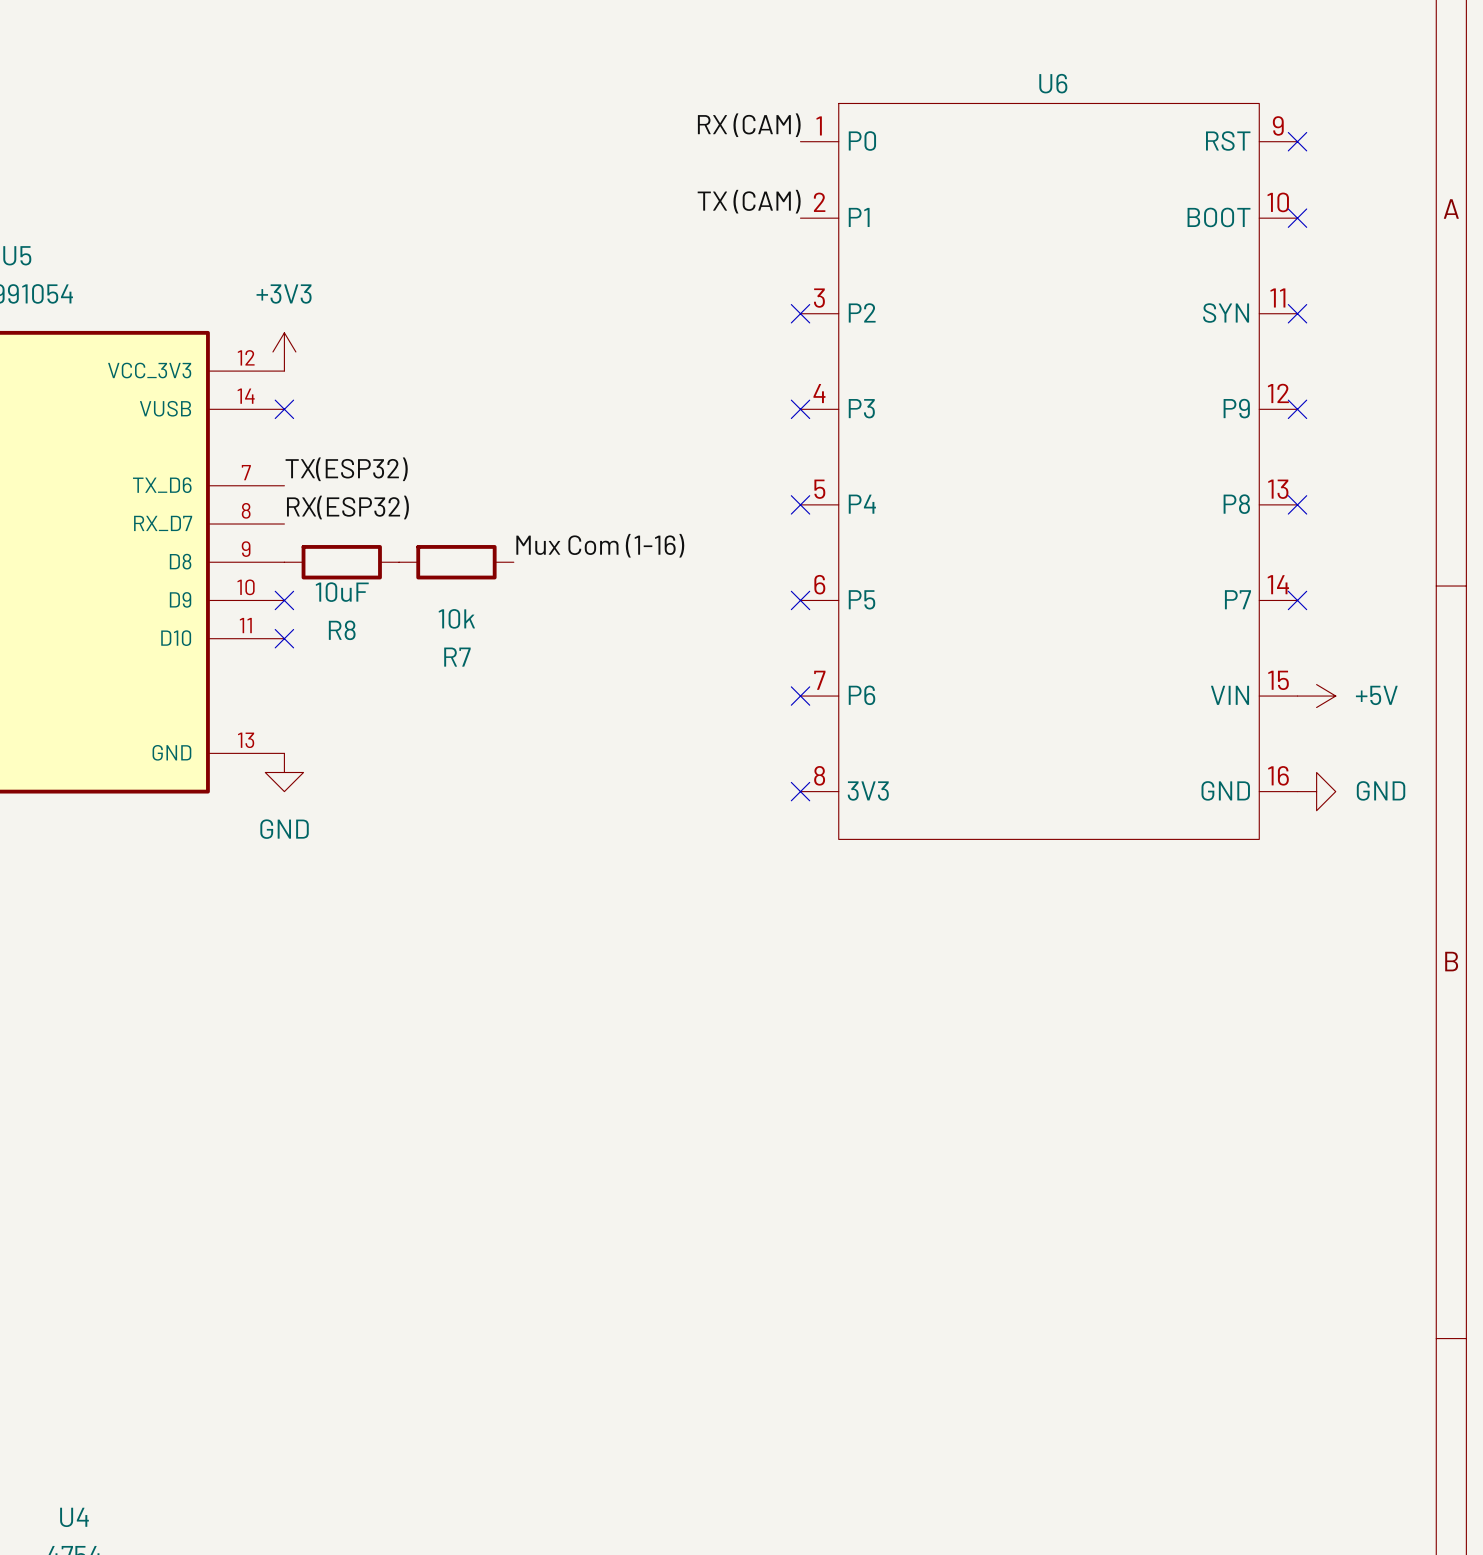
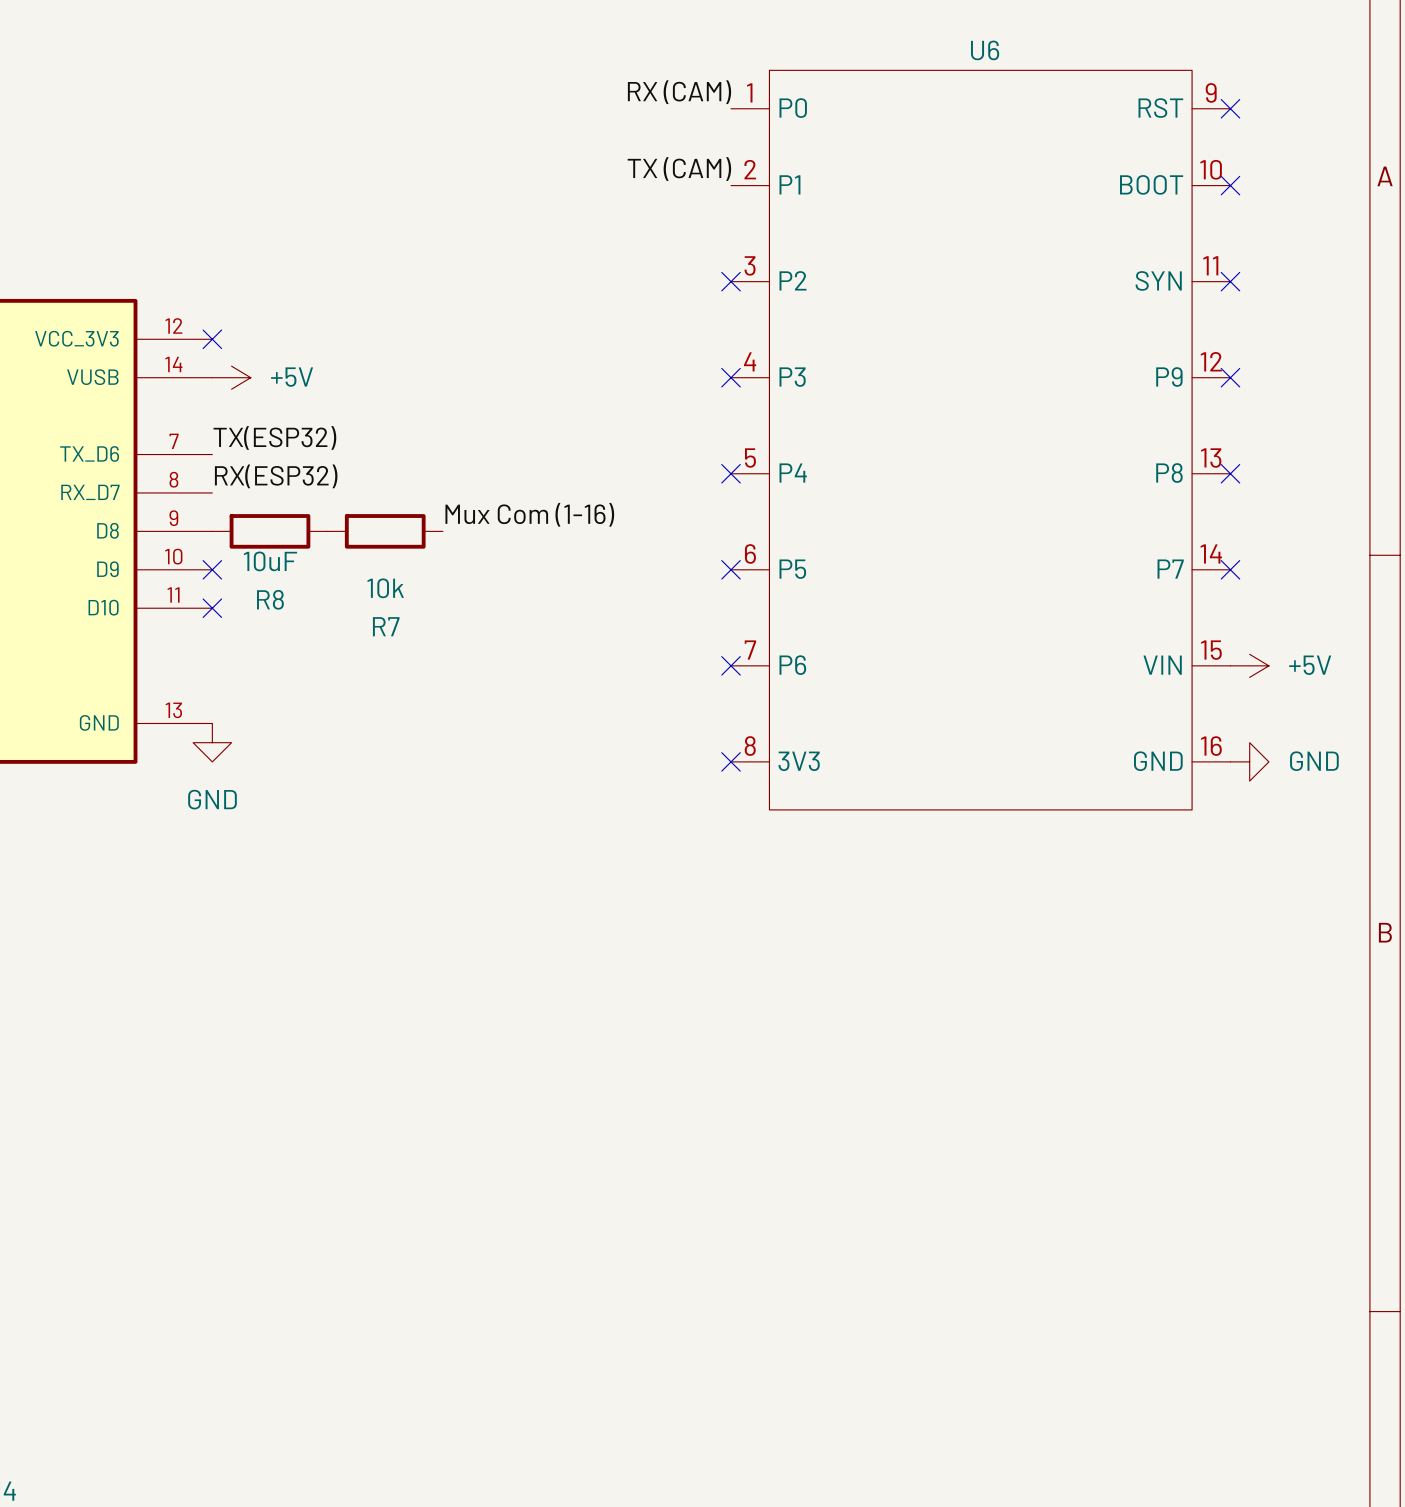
power symbol: +3V3 (284, 351) -> none
no-connect mark position: (284, 409) -> (212, 339)
power symbol: none -> +5V (231, 377)

